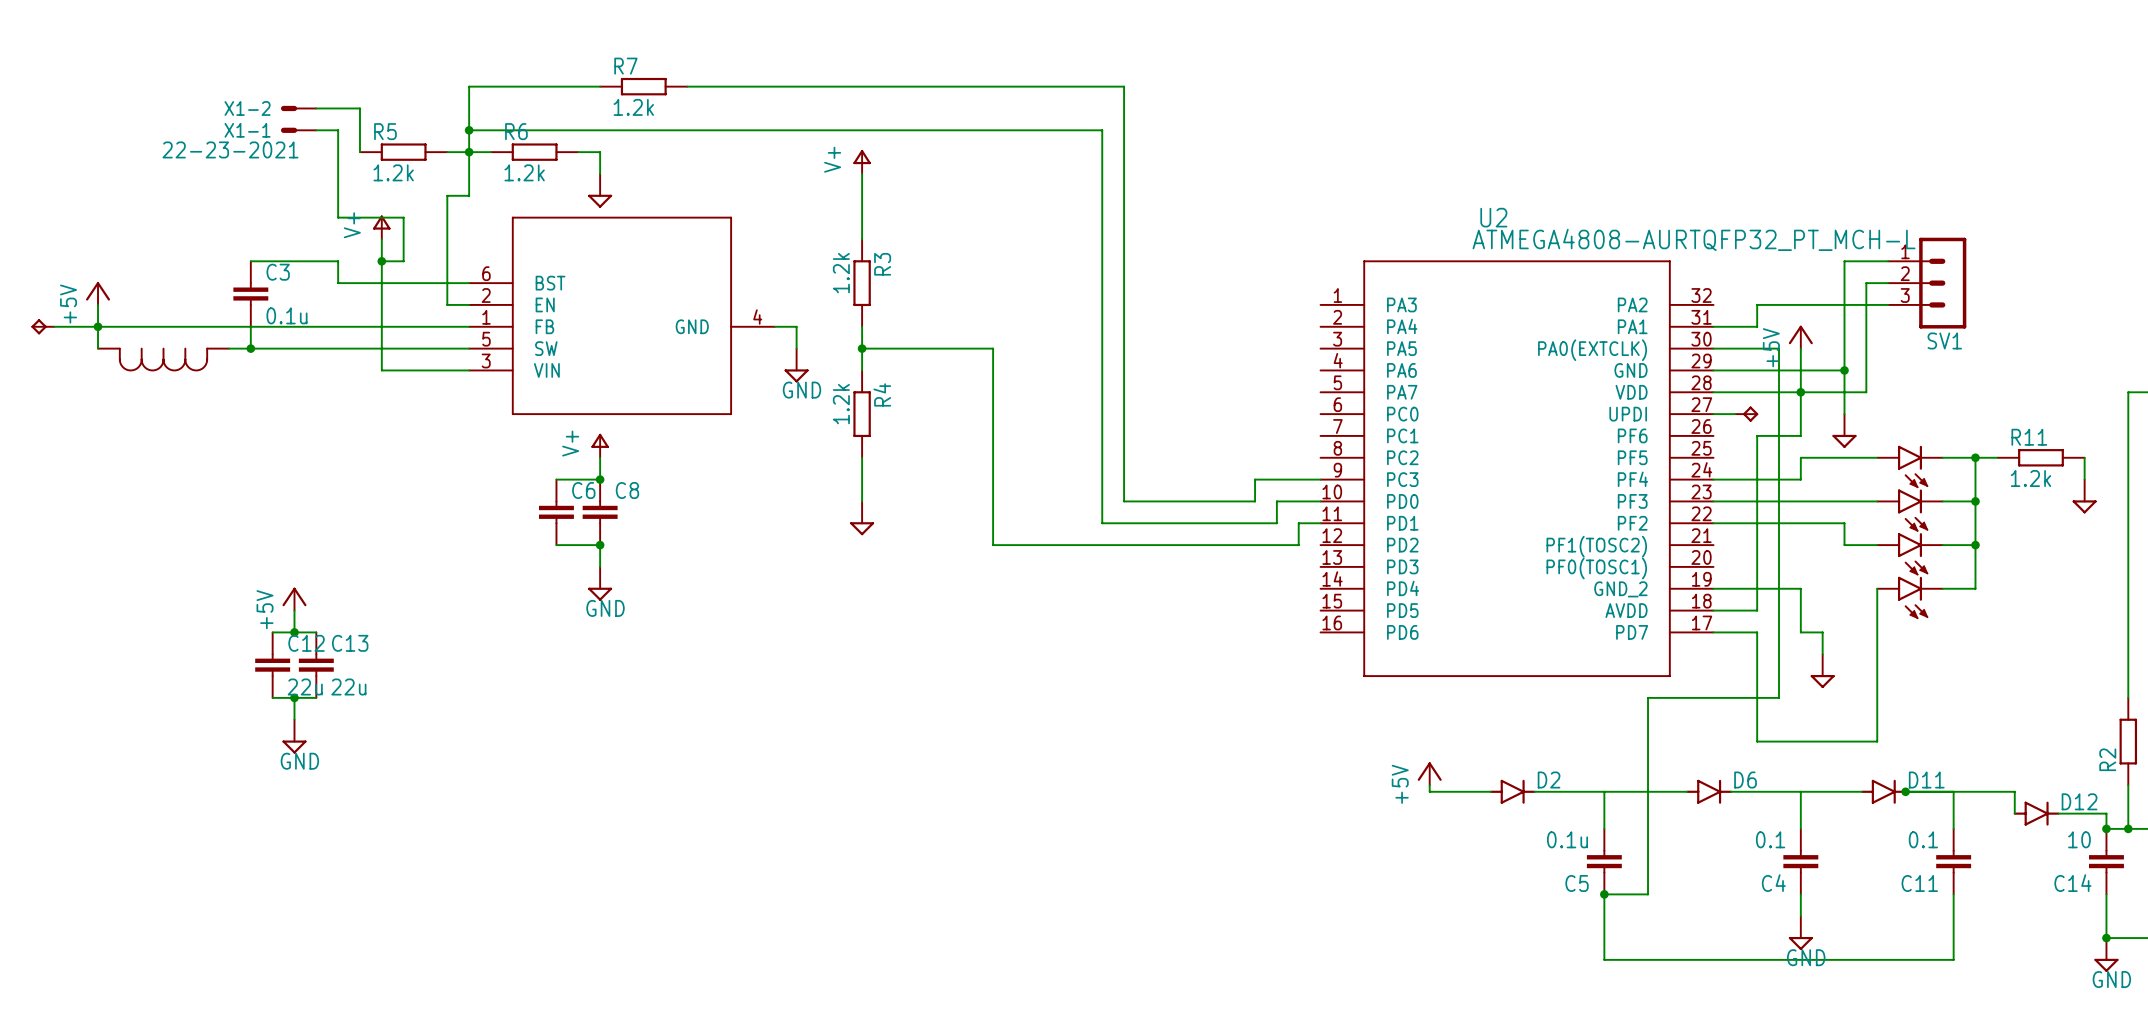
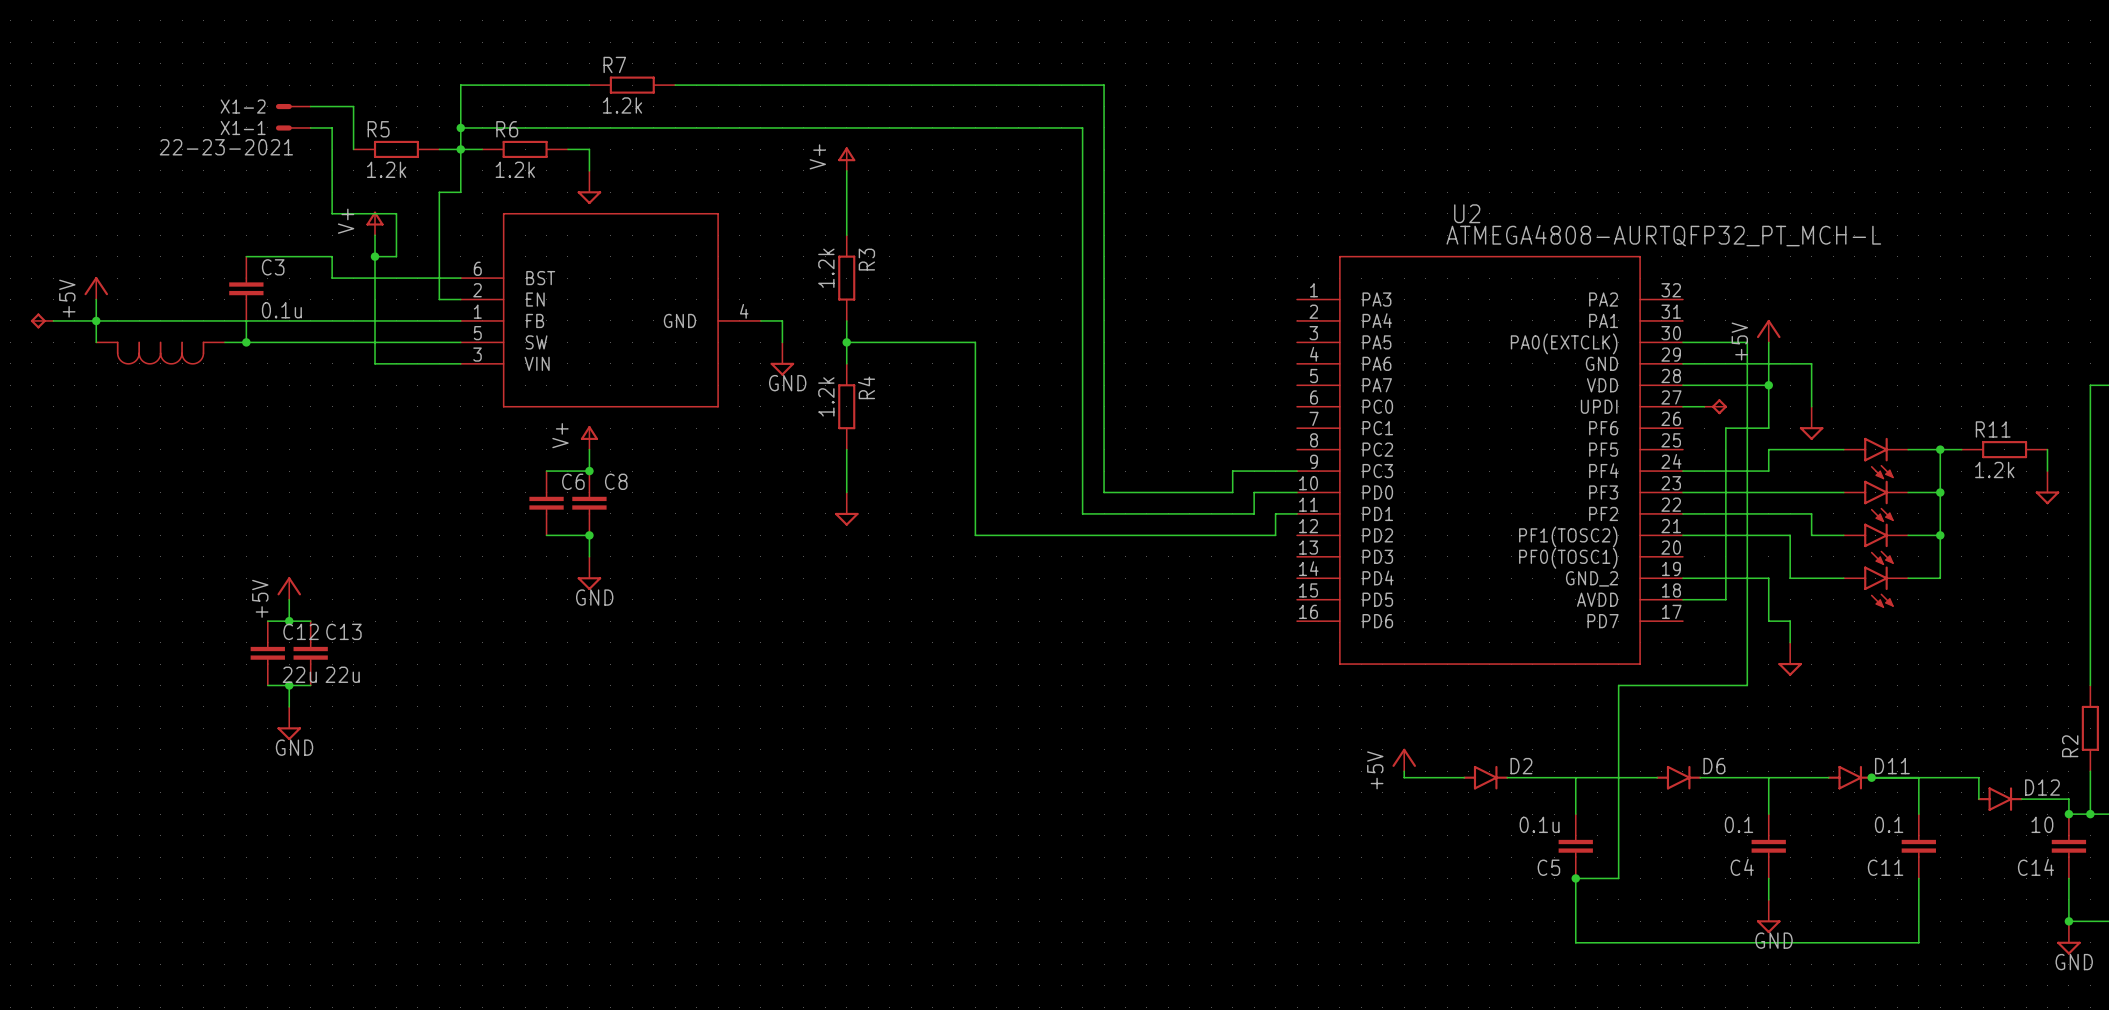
wire: (1888, 261) (1844, 261) (1844, 370) -> none
wire: (1888, 283) (1866, 283) (1866, 392) (1800, 392) -> none
SV1: (1927, 283) -> none
wire: (1888, 304) (1757, 304) (1757, 326) (1713, 326) -> none
junction: (1844, 370) -> none
wire: (1877, 588) (1877, 741) (1757, 741) (1757, 632) (1713, 632) -> (1843, 578) (1790, 578) (1790, 535) (1682, 535)

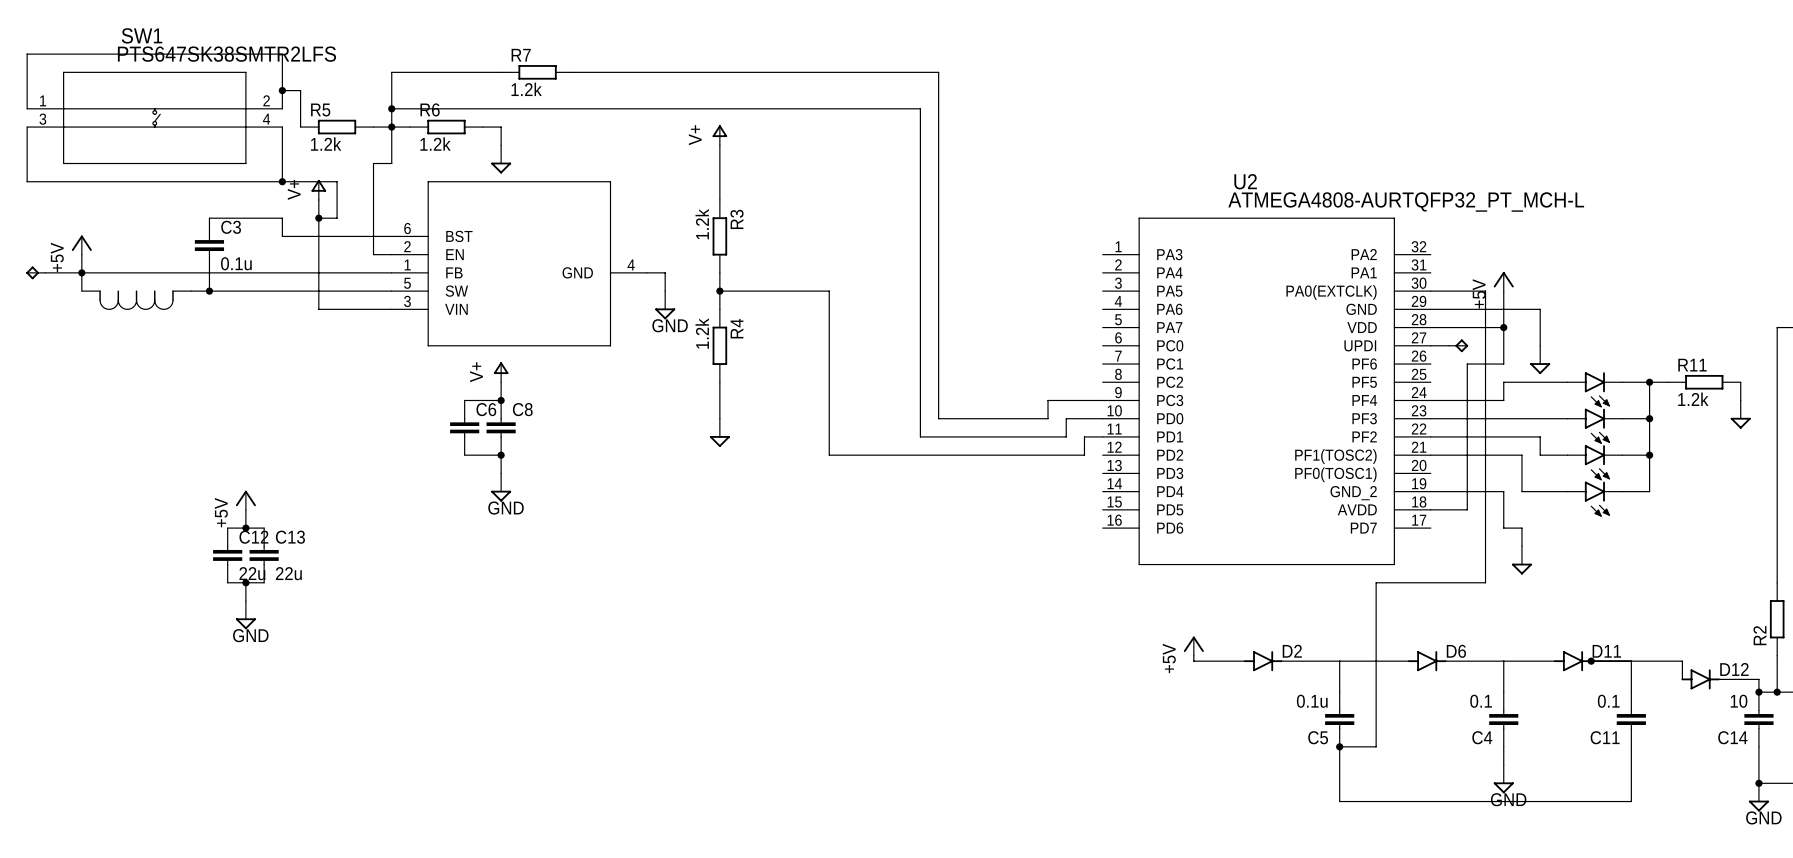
X1-2: (293, 106) -> none
wire: (310, 106) (332, 106) -> none
junction: none -> (282, 90)
wire: none -> (27, 108) (27, 54) (282, 54) (282, 108)
X1-1: 22-23-2021 (293, 127) -> none
wire: (310, 127) (332, 127) (332, 149) -> none
SW1: none -> PTS647SK38SMTR2LFS (154, 117)
wire: none -> (27, 127) (27, 181) (282, 181)
junction: none -> (282, 181)

